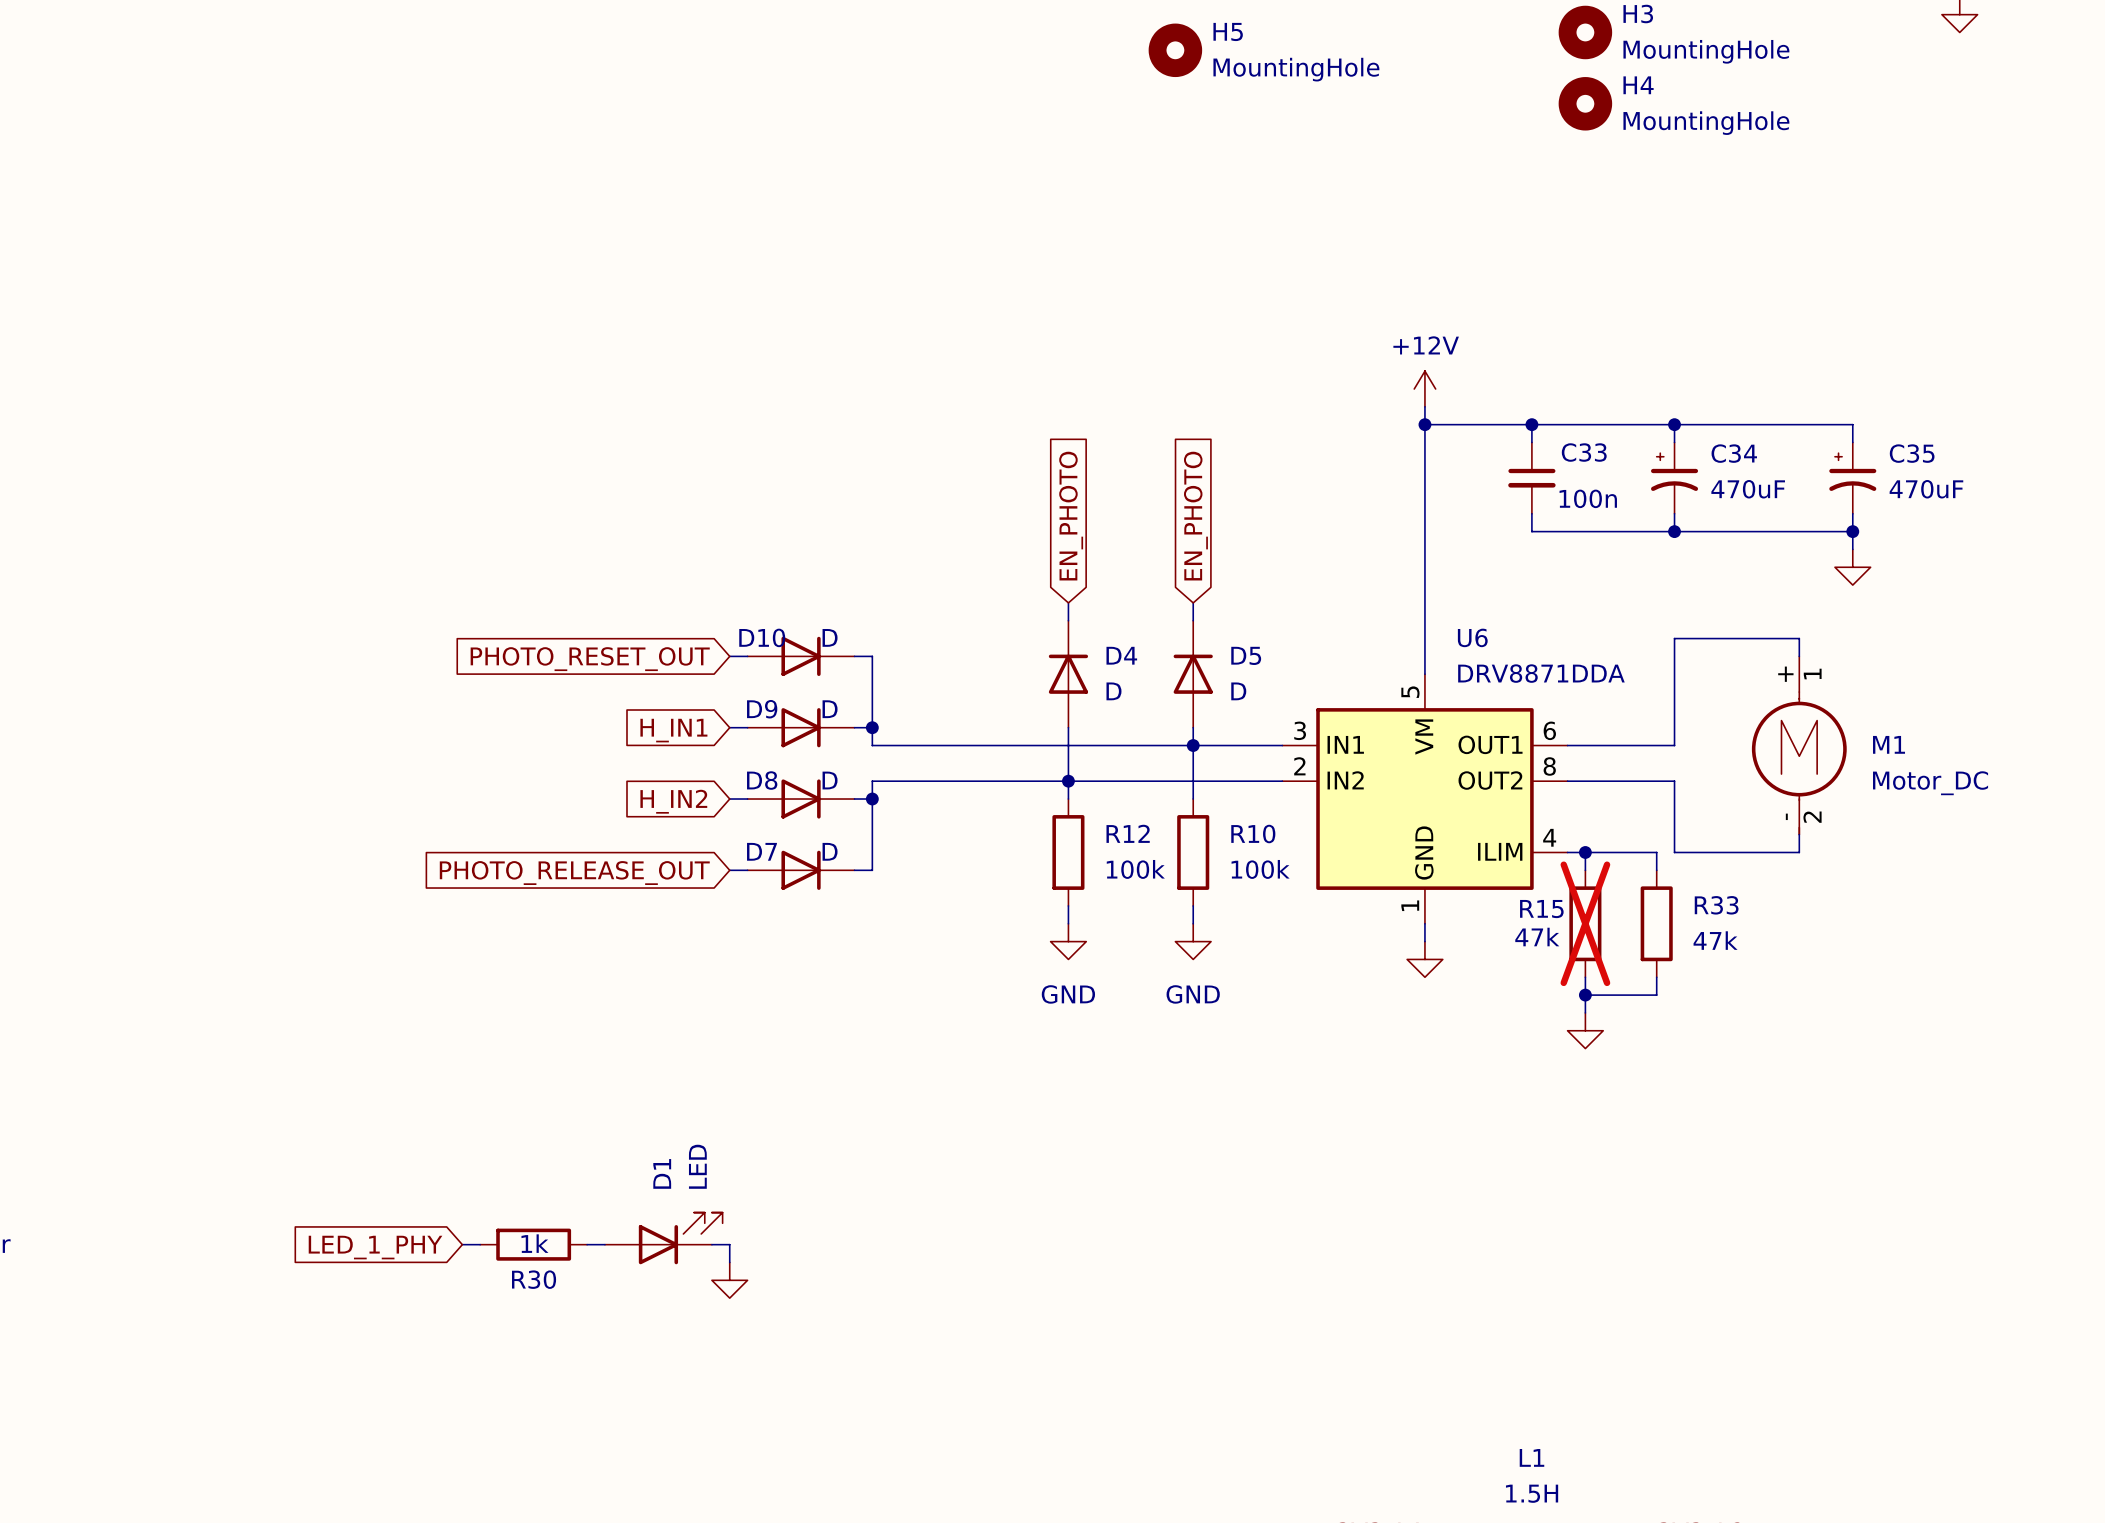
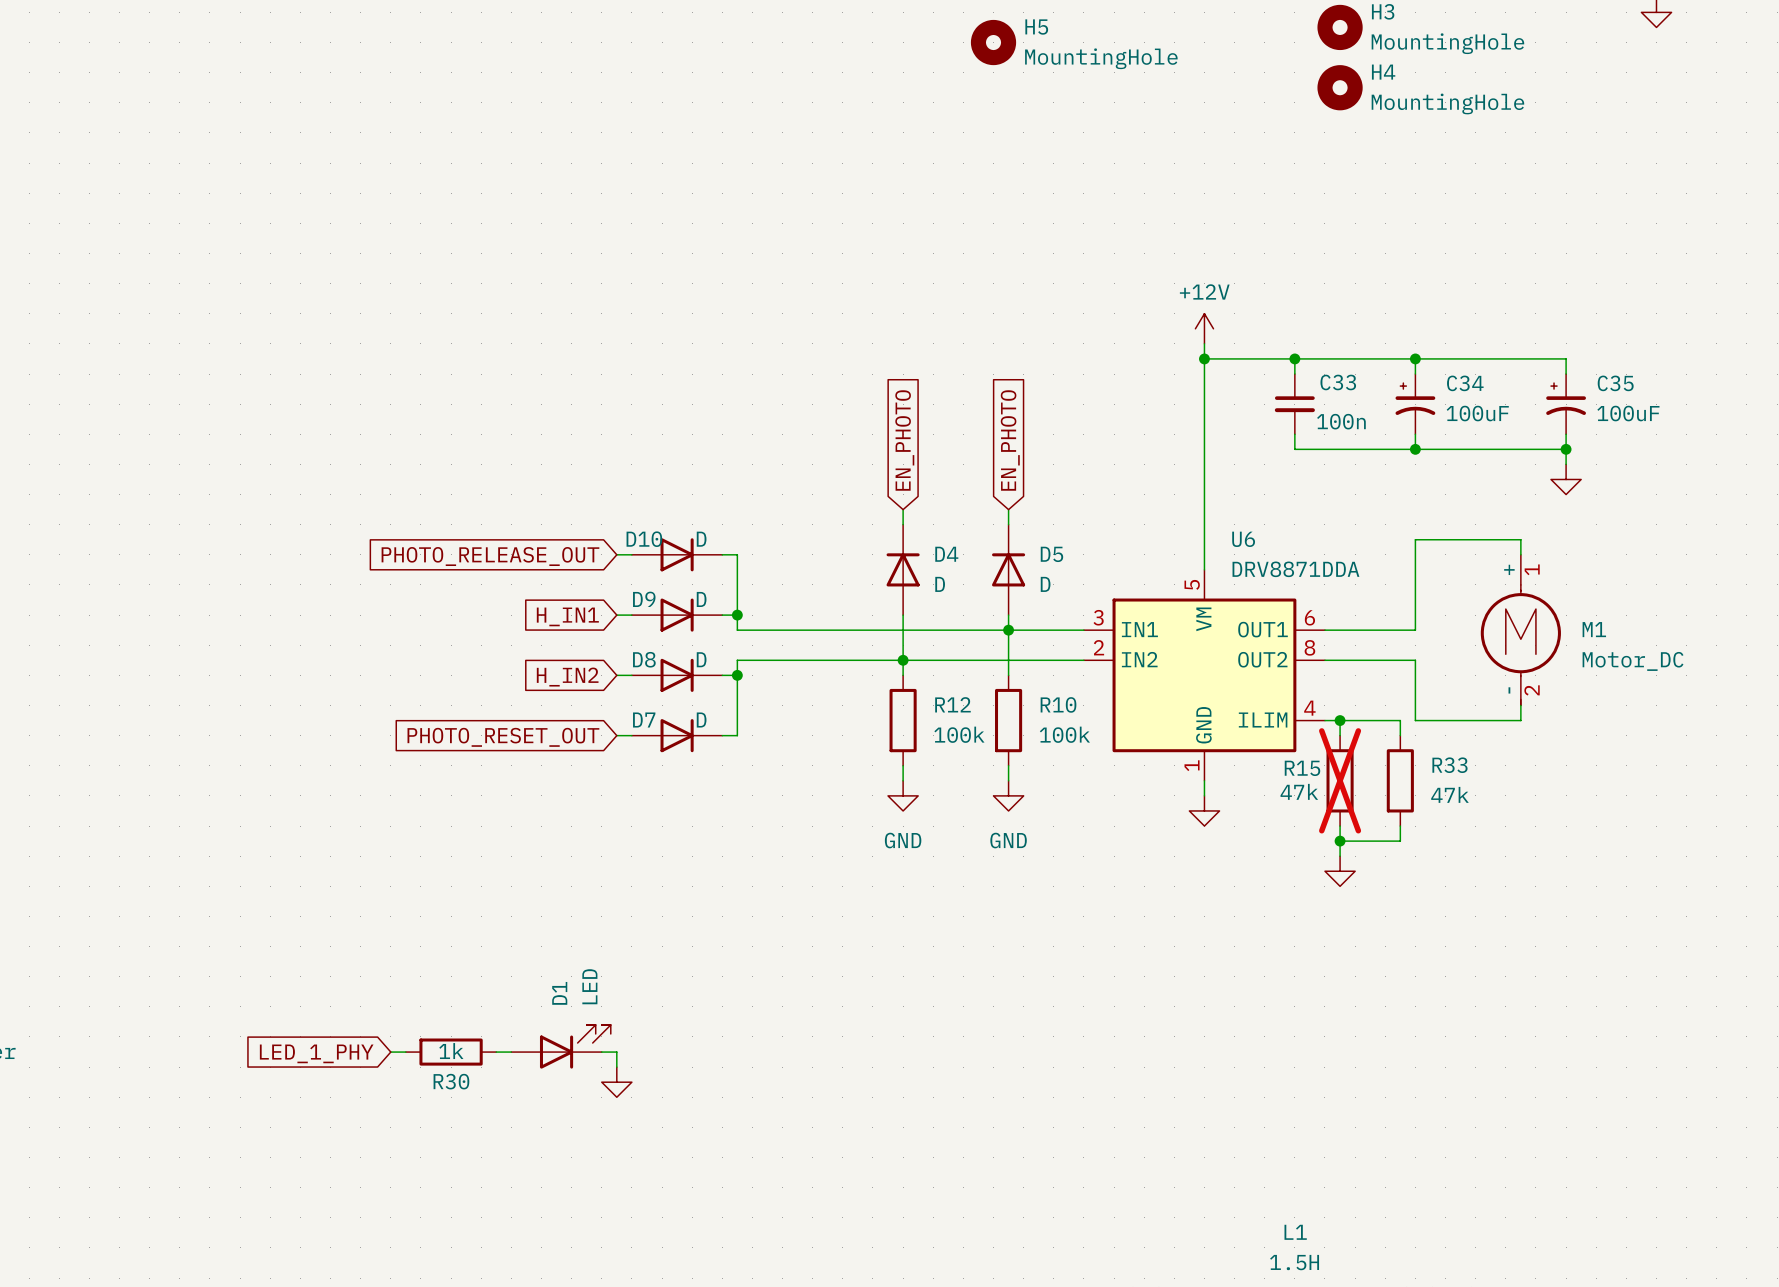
C34 value: 470uF (1748, 489) -> 100uF (1477, 413)
C35 value: 470uF (1926, 489) -> 100uF (1628, 413)
global label: PHOTO_RESET_OUT (590, 659) -> PHOTO_RELEASE_OUT (490, 556)
global label: PHOTO_RELEASE_OUT (574, 873) -> PHOTO_RESET_OUT (503, 737)

